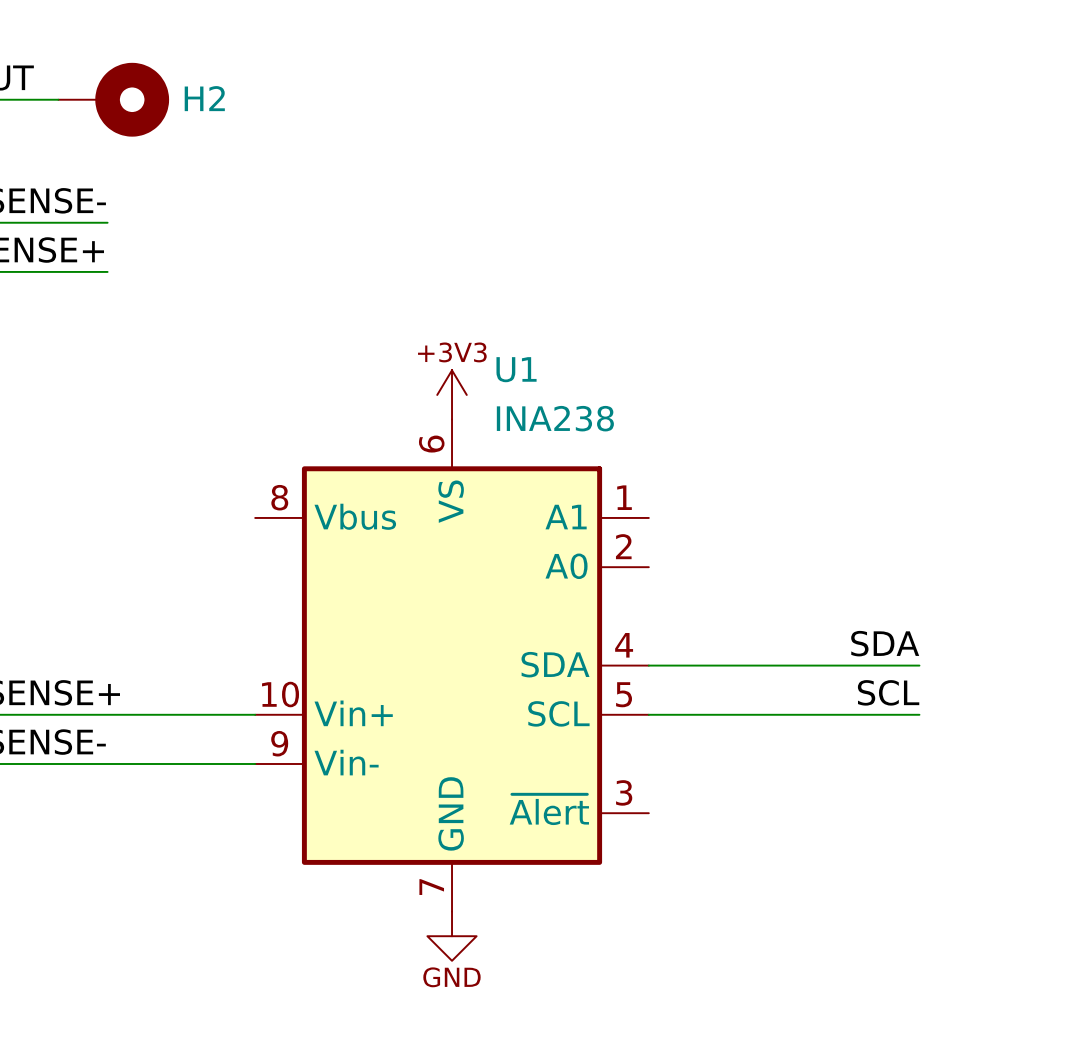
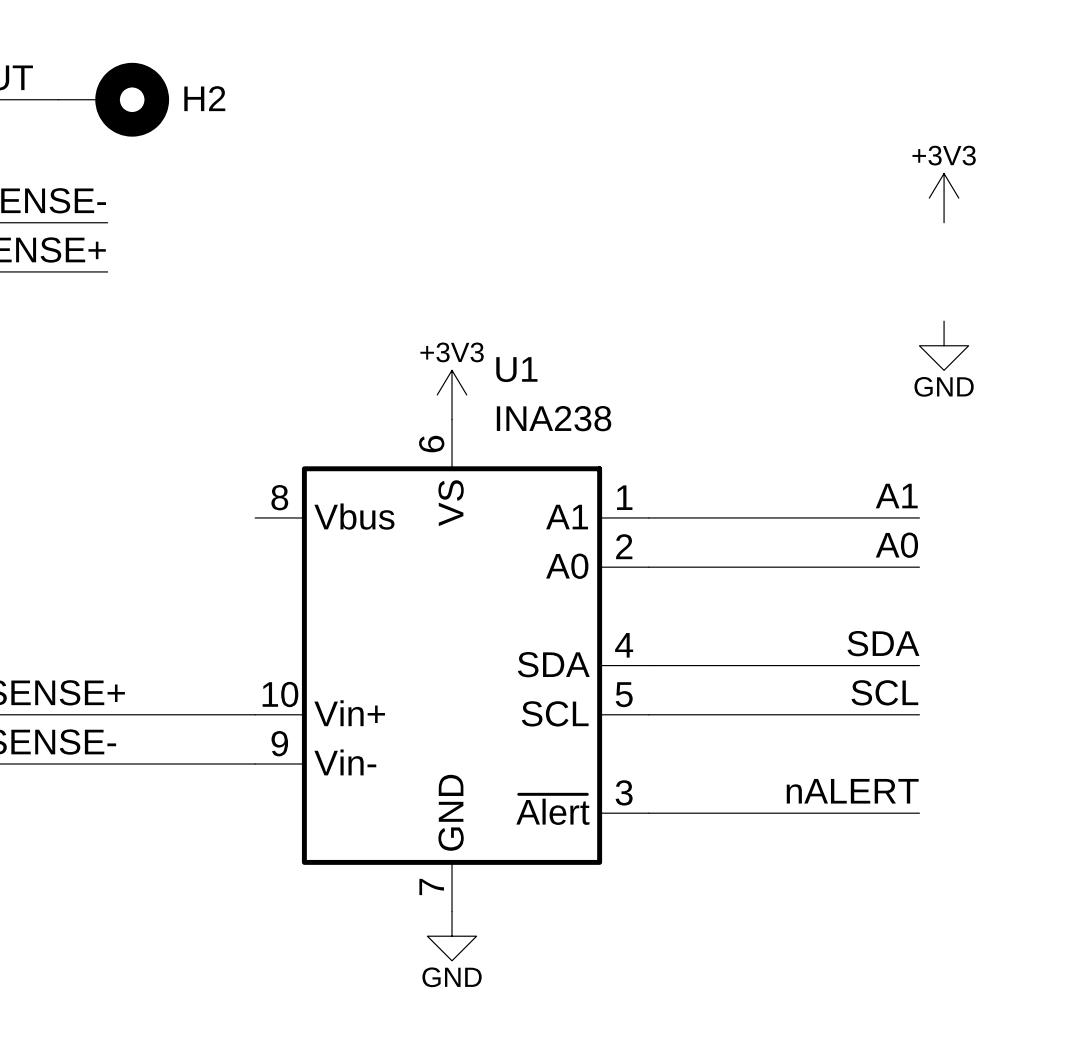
power symbol: none -> (944, 198)
power symbol: none -> (944, 345)
label: none -> A1 (896, 496)
wire: none -> (648, 517) (919, 517)
label: none -> A0 (896, 545)
wire: none -> (648, 567) (919, 567)
label: none -> nALERT (852, 791)
wire: none -> (648, 813) (919, 813)

